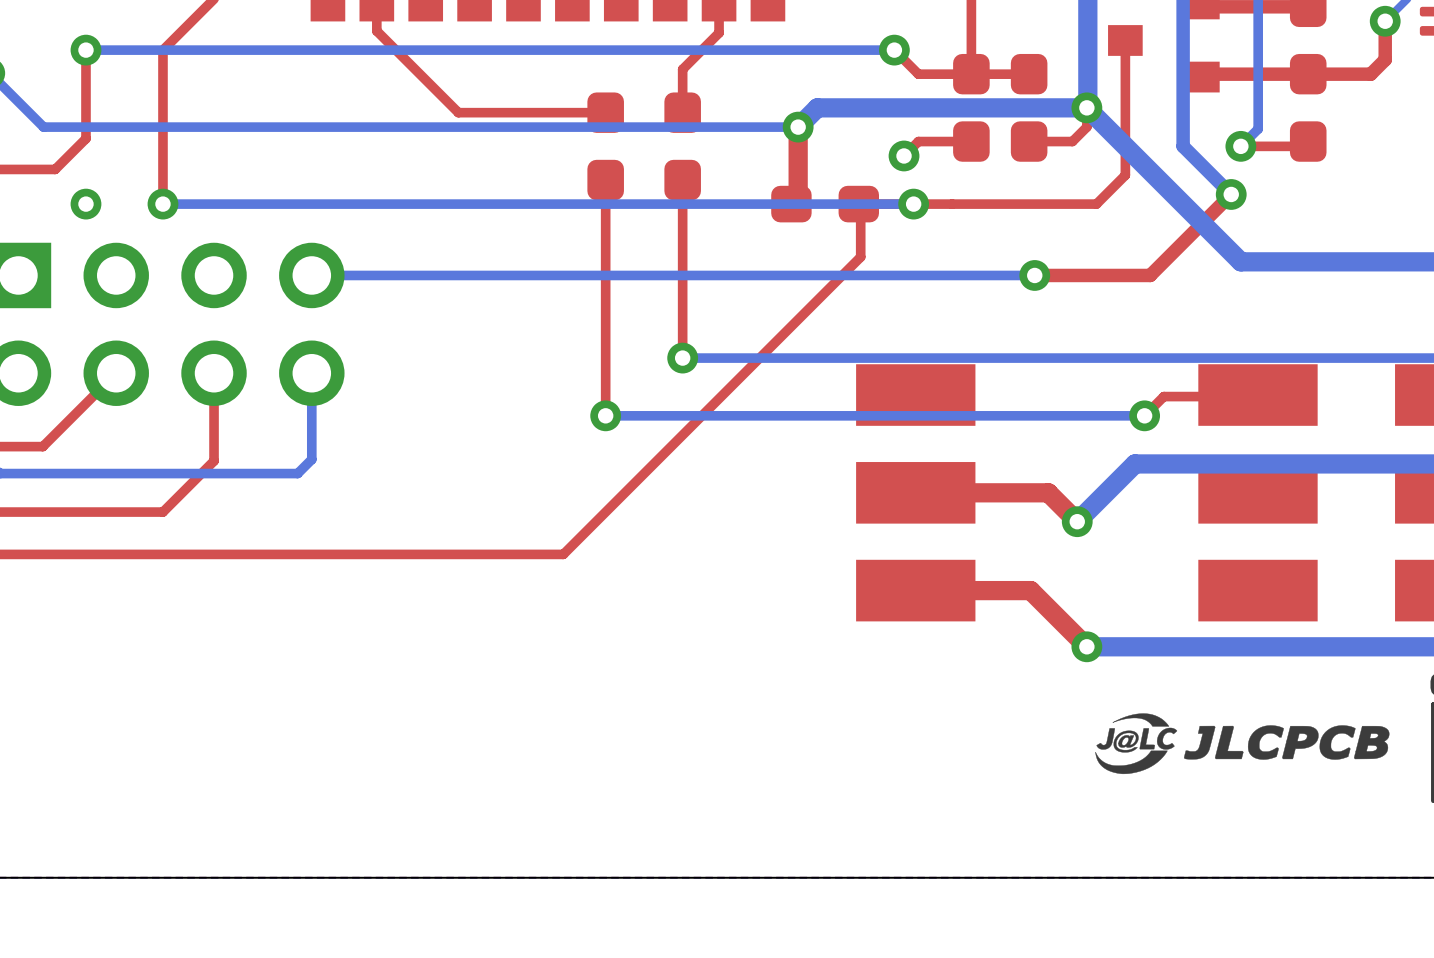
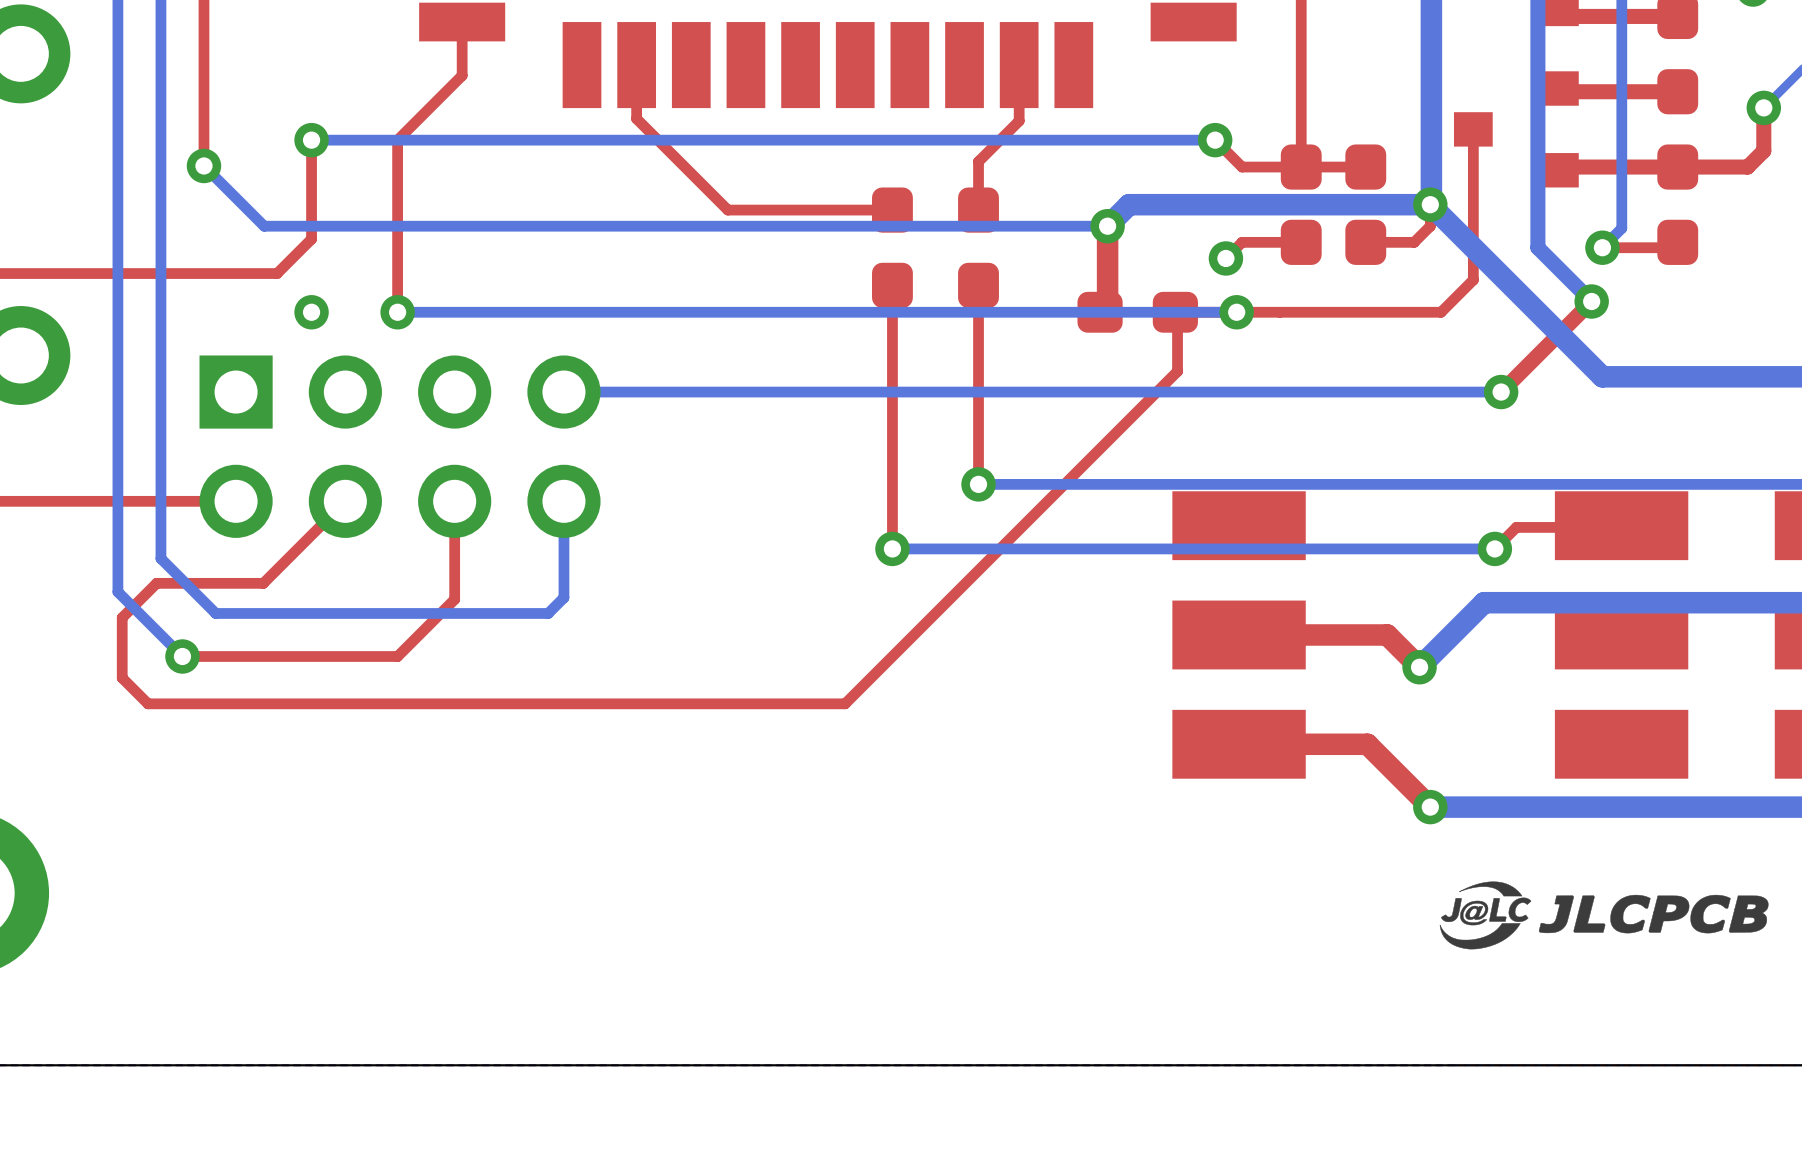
via position: (1034, 275) -> (1501, 392)
top track: (1150, 275) (1034, 275) -> none
bottom track: none -> (1501, 392) (1372, 392)

